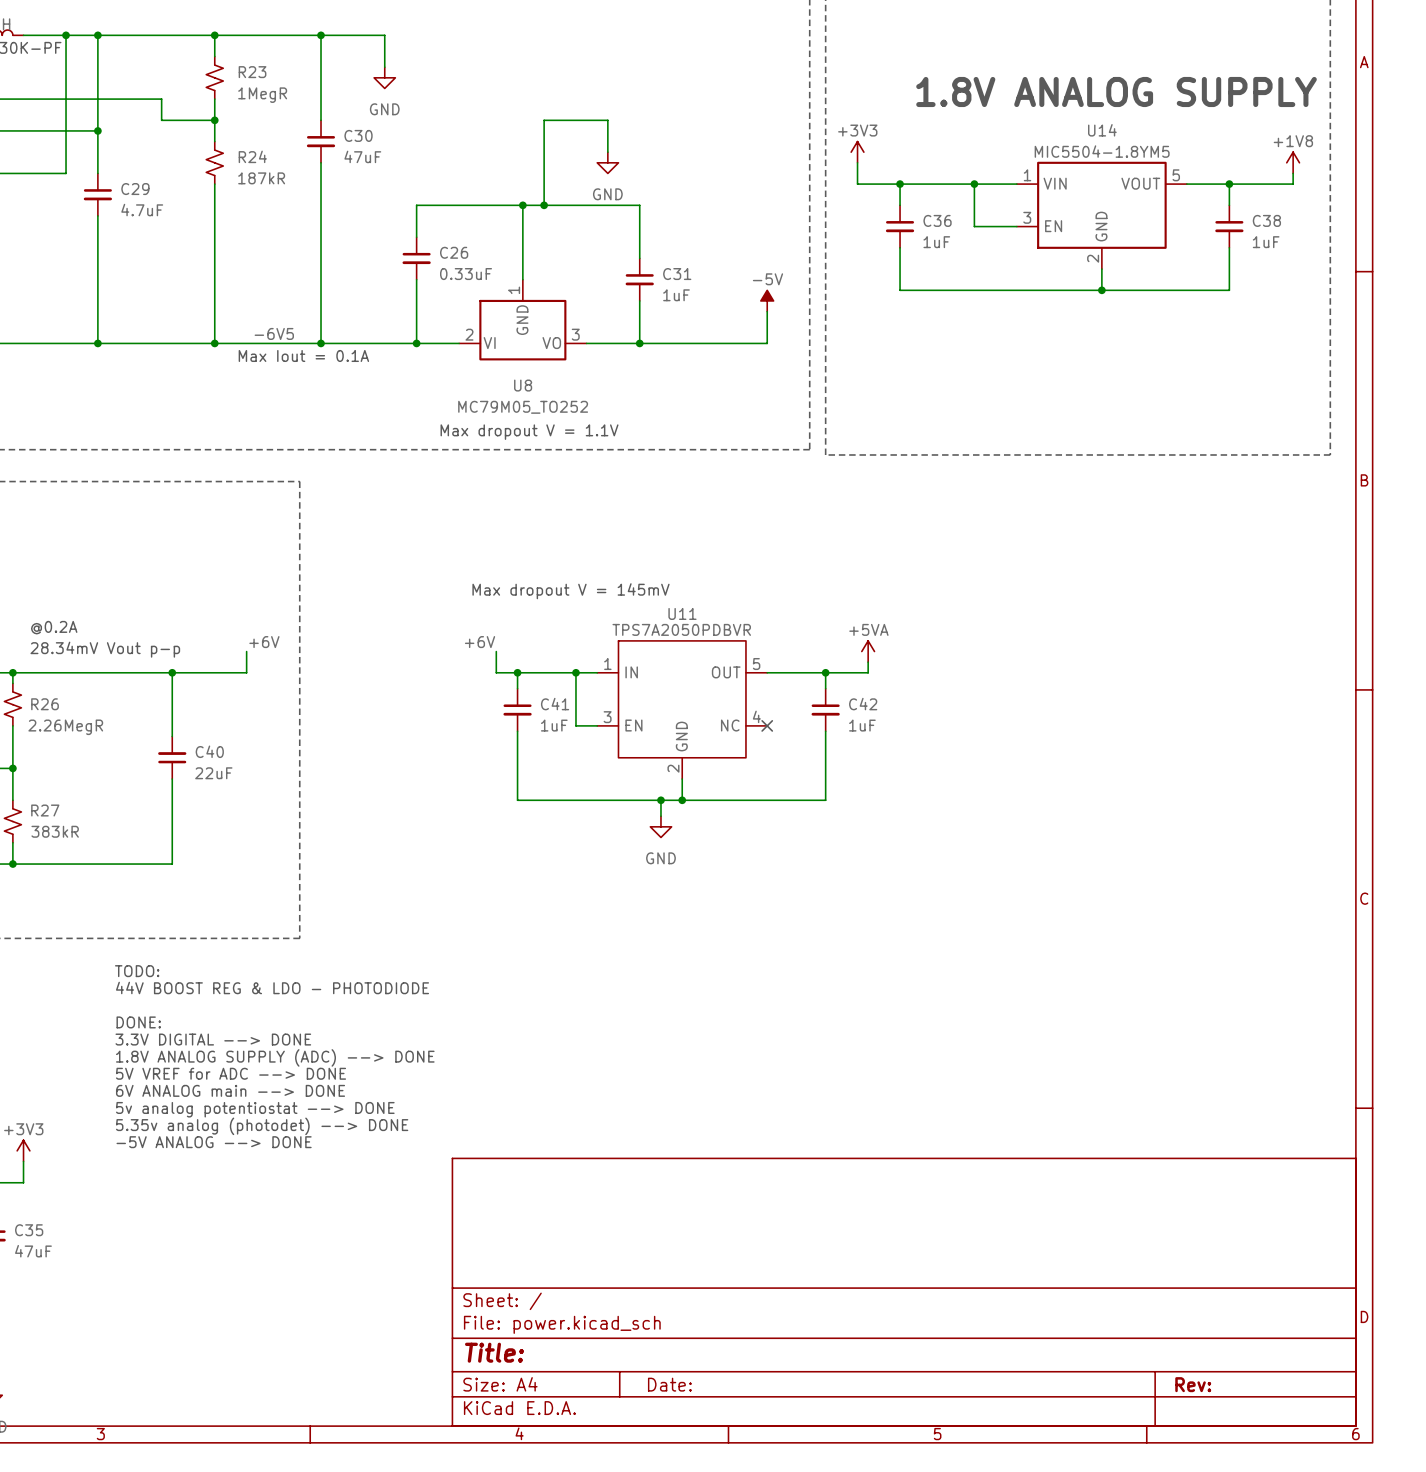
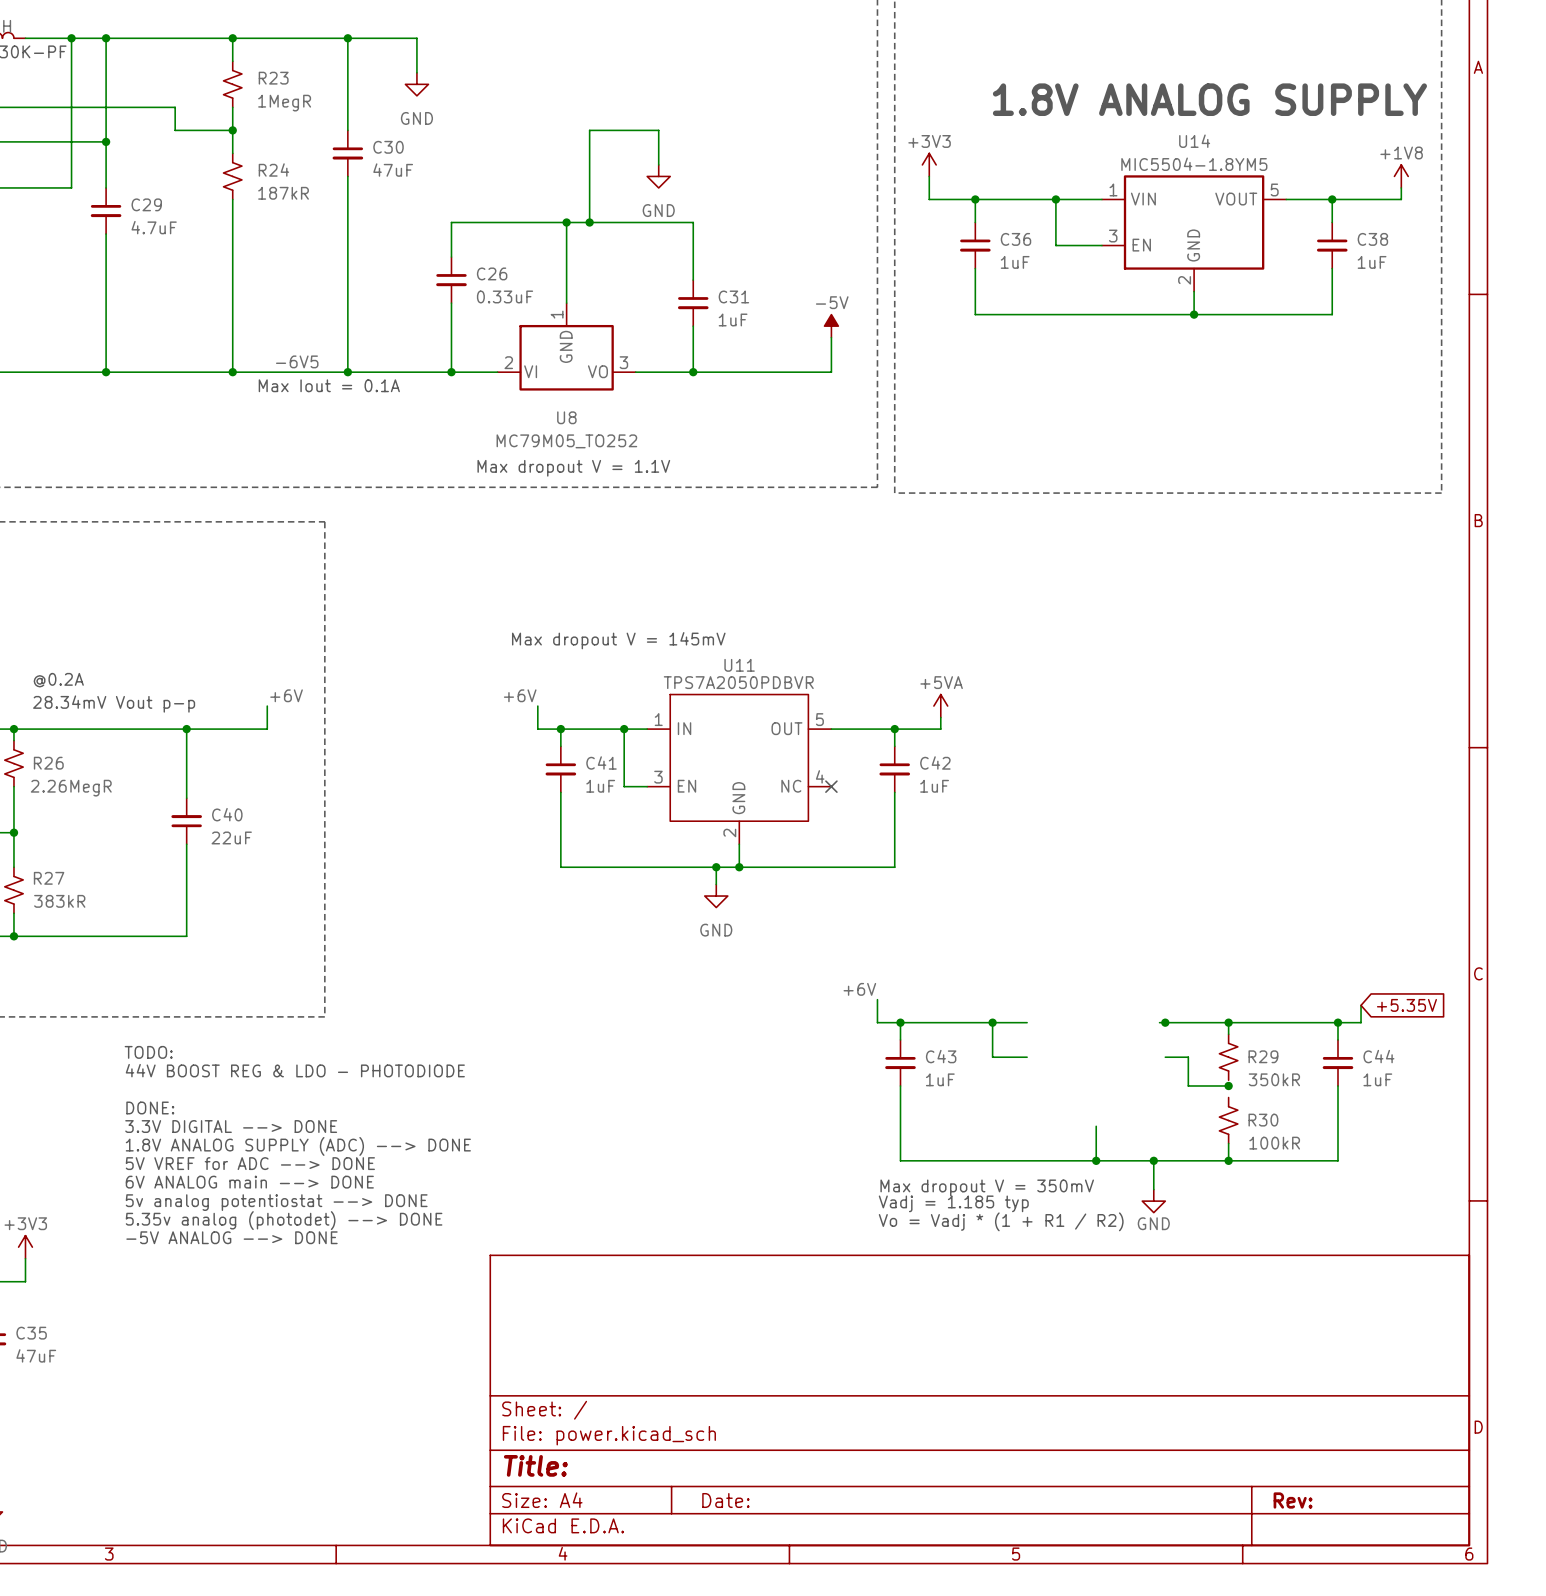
label: none -> +6V (859, 989)
wire: none -> (877, 999) (877, 1022) (1027, 1022)
wire: none -> (1361, 1005) (1361, 1022) (1159, 1022)
global label: none -> +5.35V (1406, 1005)
wire: none -> (900, 1022) (900, 1039)
junction: none -> (900, 1022)
wire: none -> (992, 1022) (992, 1057) (1027, 1057)
junction: none -> (992, 1022)
junction: none -> (1165, 1022)
wire: none -> (1228, 1022) (1228, 1034)
junction: none -> (1228, 1022)
wire: none -> (1337, 1022) (1337, 1039)
junction: none -> (1337, 1022)
wire: none -> (1165, 1057) (1188, 1057) (1188, 1085) (1228, 1085)
R29: none -> 350kR (1228, 1057)
C43: none -> 1uF (900, 1062)
C44: none -> 1uF (1337, 1062)
wire: none -> (900, 1085) (900, 1160) (1337, 1160) (1337, 1085)
junction: none -> (1228, 1085)
R30: none -> 100kR (1228, 1120)
wire: none -> (1096, 1126) (1096, 1160)
wire: none -> (1228, 1143) (1228, 1160)
junction: none -> (1096, 1160)
wire: none -> (1153, 1160) (1153, 1189)
junction: none -> (1153, 1160)
junction: none -> (1228, 1160)
text: none -> Max dropout V = 350mV (987, 1187)
power symbol: none -> GND (1153, 1201)
text: none -> Vadj = 1.185 typ (953, 1203)
text: none -> Vo = Vadj * (1 + R1 / R2) (1001, 1221)

